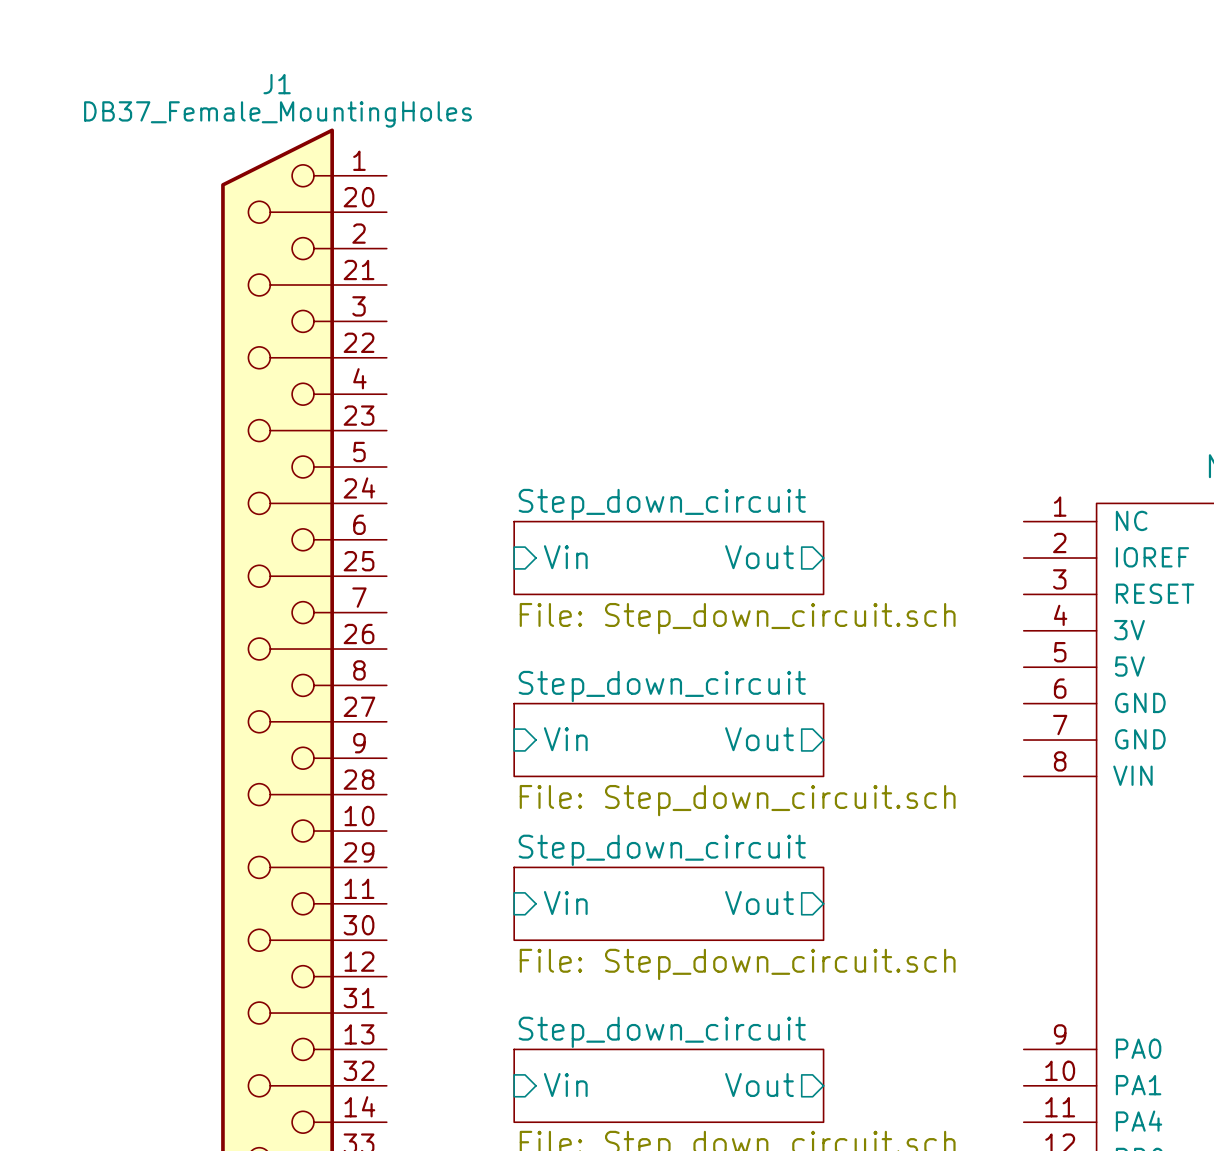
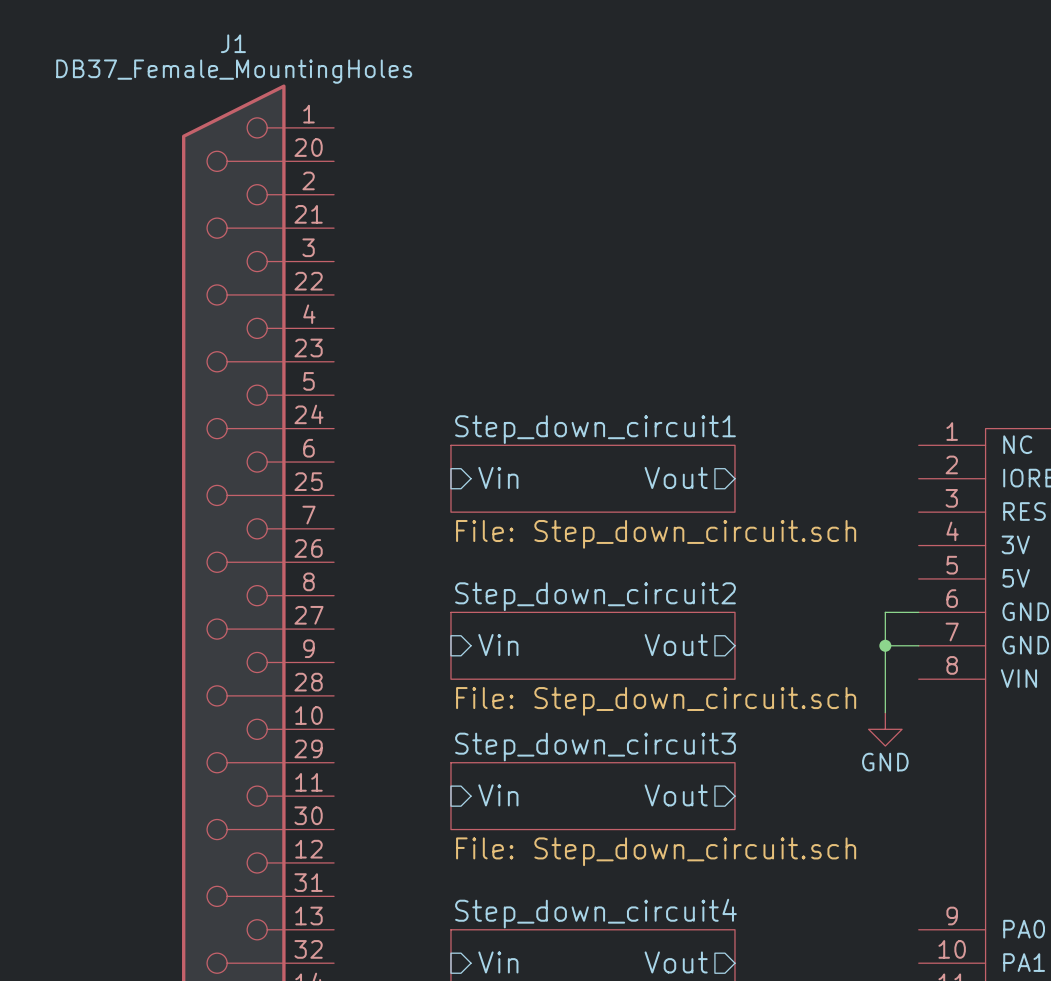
sheet Step_down_circuit name: Step_down_circuit (662, 504) -> Step_down_circuit1 (595, 429)
sheet Step_down_circuit name: Step_down_circuit (662, 686) -> Step_down_circuit2 (595, 596)
wire: none -> (918, 612) (885, 612) (885, 712)
wire: none -> (885, 645) (918, 645)
junction: none -> (885, 645)
power symbol: none -> GND (885, 729)
sheet Step_down_circuit name: Step_down_circuit (662, 850) -> Step_down_circuit3 (595, 747)
sheet Step_down_circuit name: Step_down_circuit (662, 1032) -> Step_down_circuit4 (595, 913)

